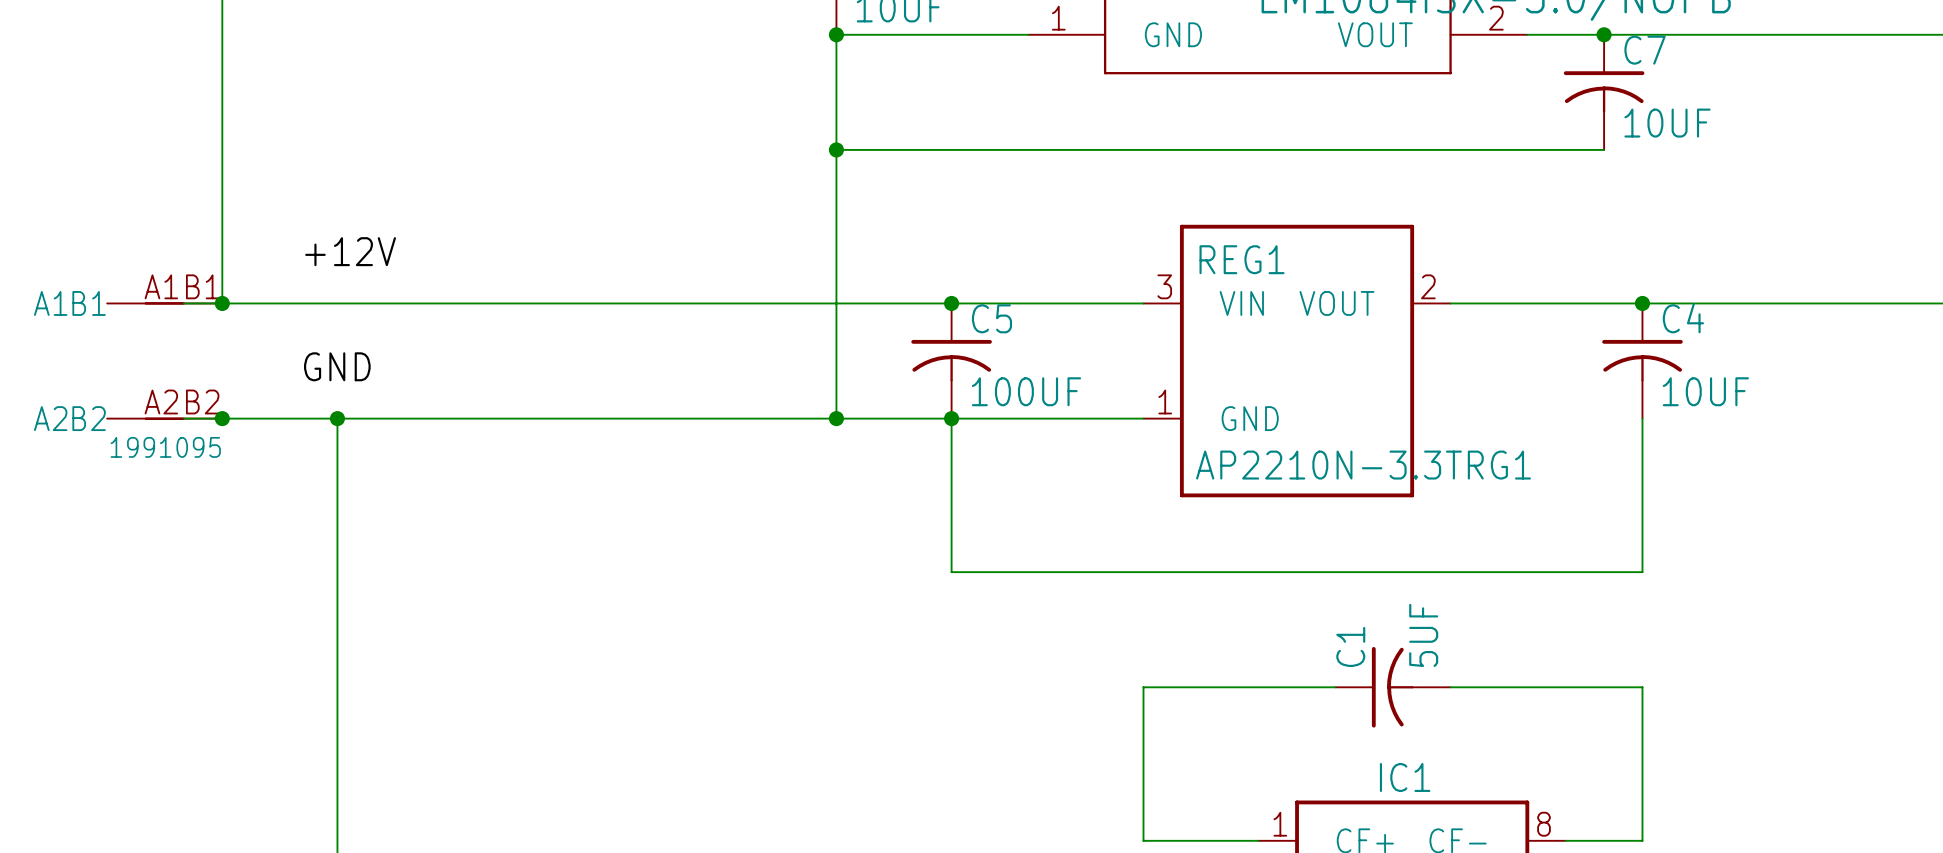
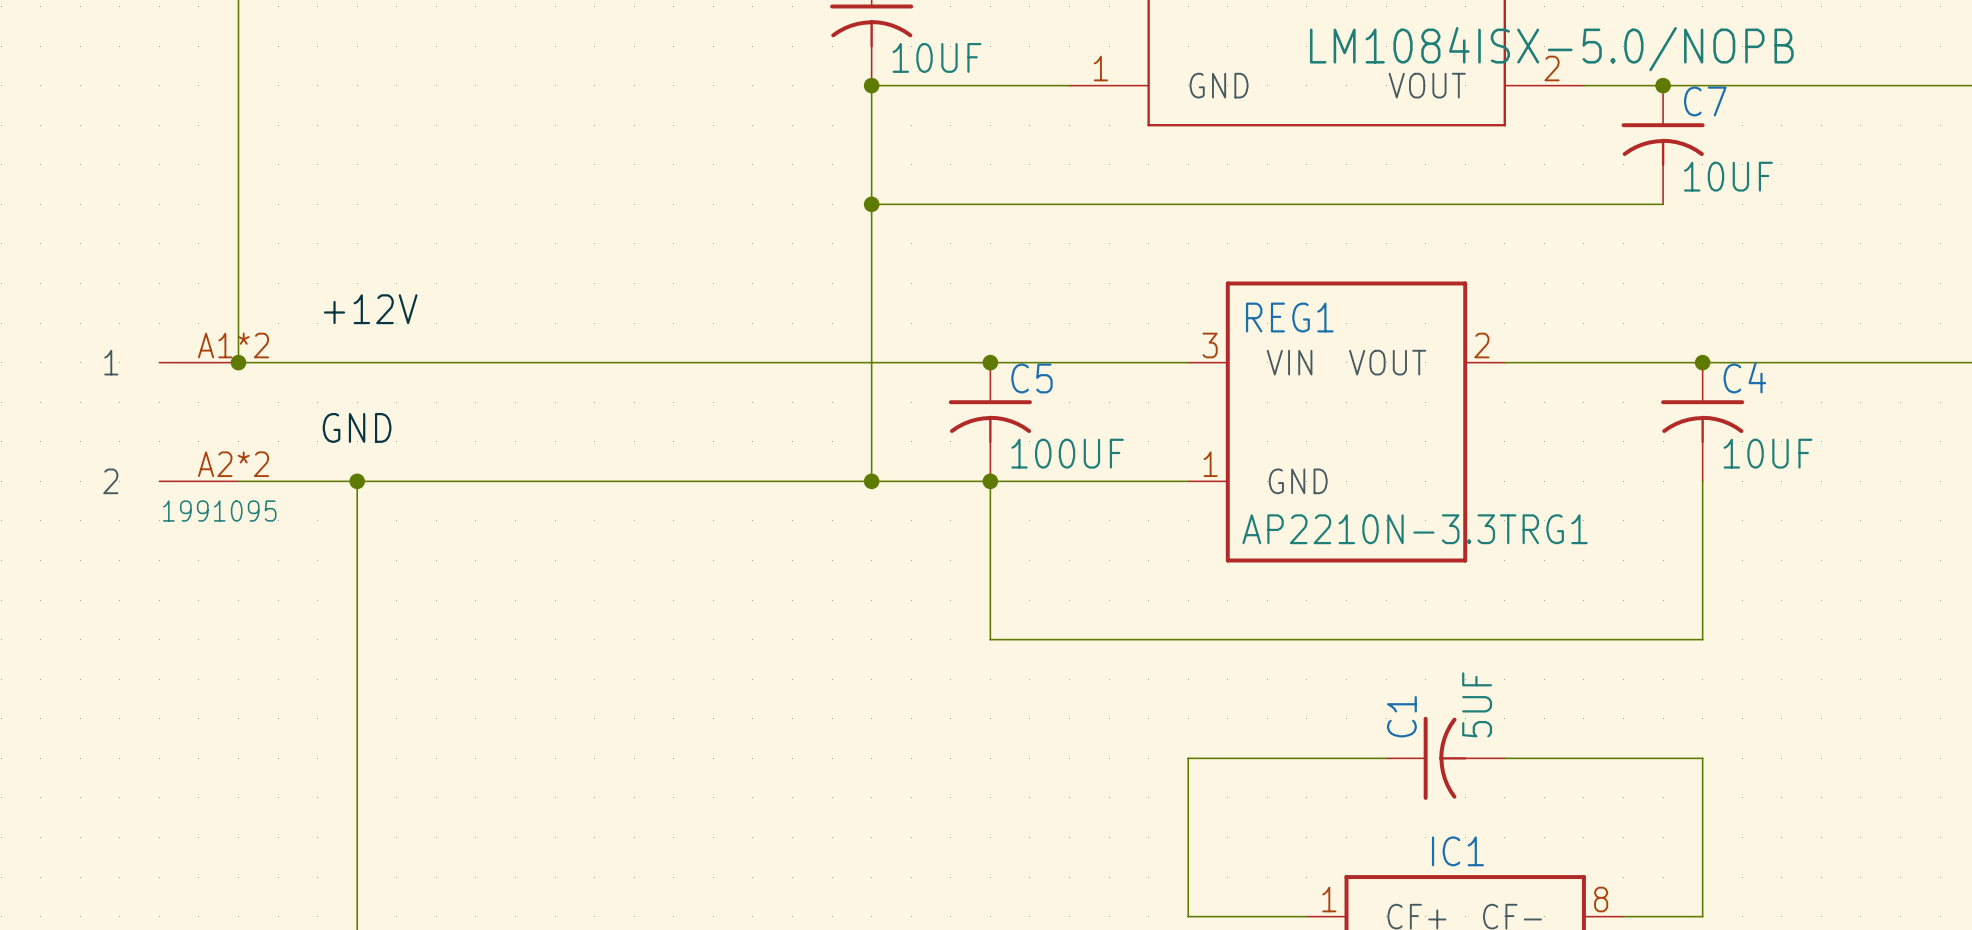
part: (164, 303) -> none
part: none -> (198, 362)
part: 1991095 (164, 418) -> none
part: none -> 1991095 (198, 481)
junction: (222, 418) -> none

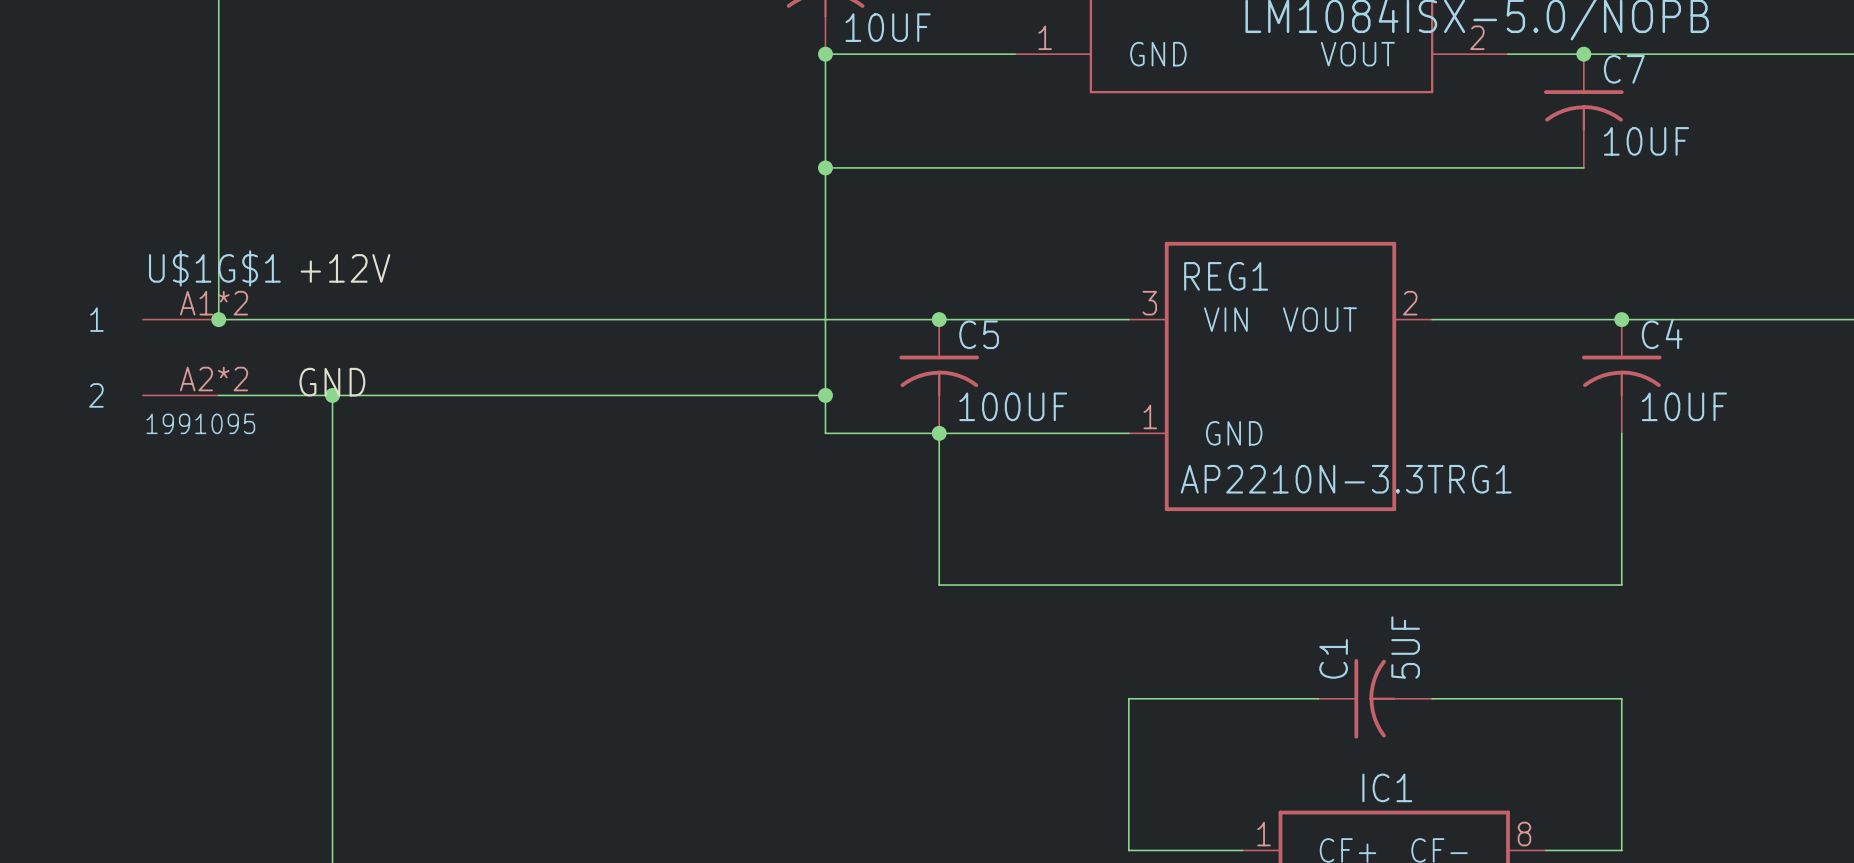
U$1G$1 name: none -> U$1G$1 (214, 268)
wire: none -> (332, 395) (332, 433)
part position: (198, 481) -> (180, 395)
wire: (238, 481) (871, 481) -> (218, 395) (825, 395)
junction position: (357, 481) -> (332, 395)
junction position: (871, 481) -> (825, 395)

